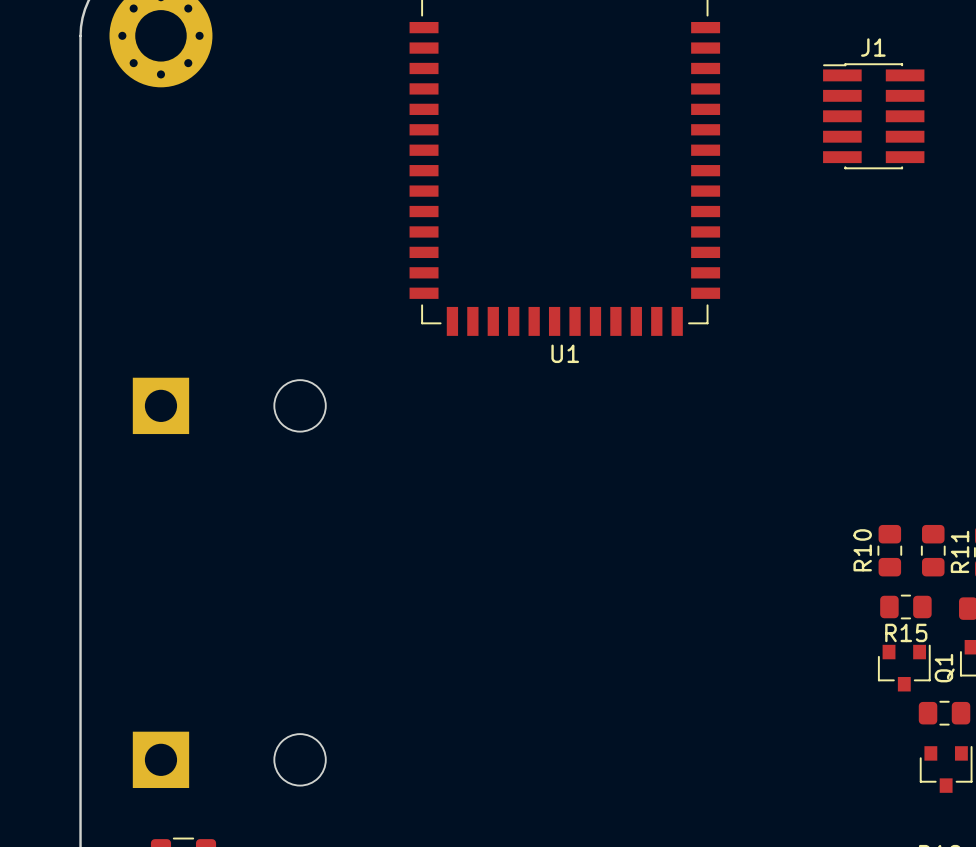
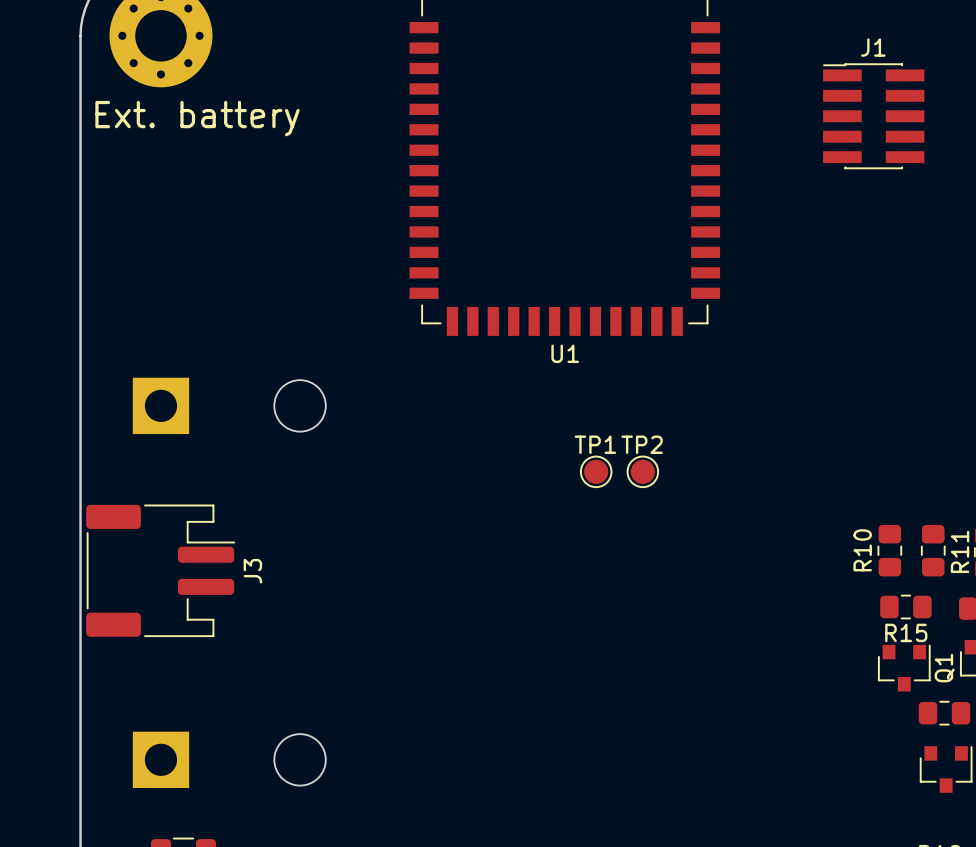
text: none -> Ext. battery (197, 118)
TP1: none -> (596, 471)
TP2: none -> (642, 471)
J3: none -> (160, 570)

